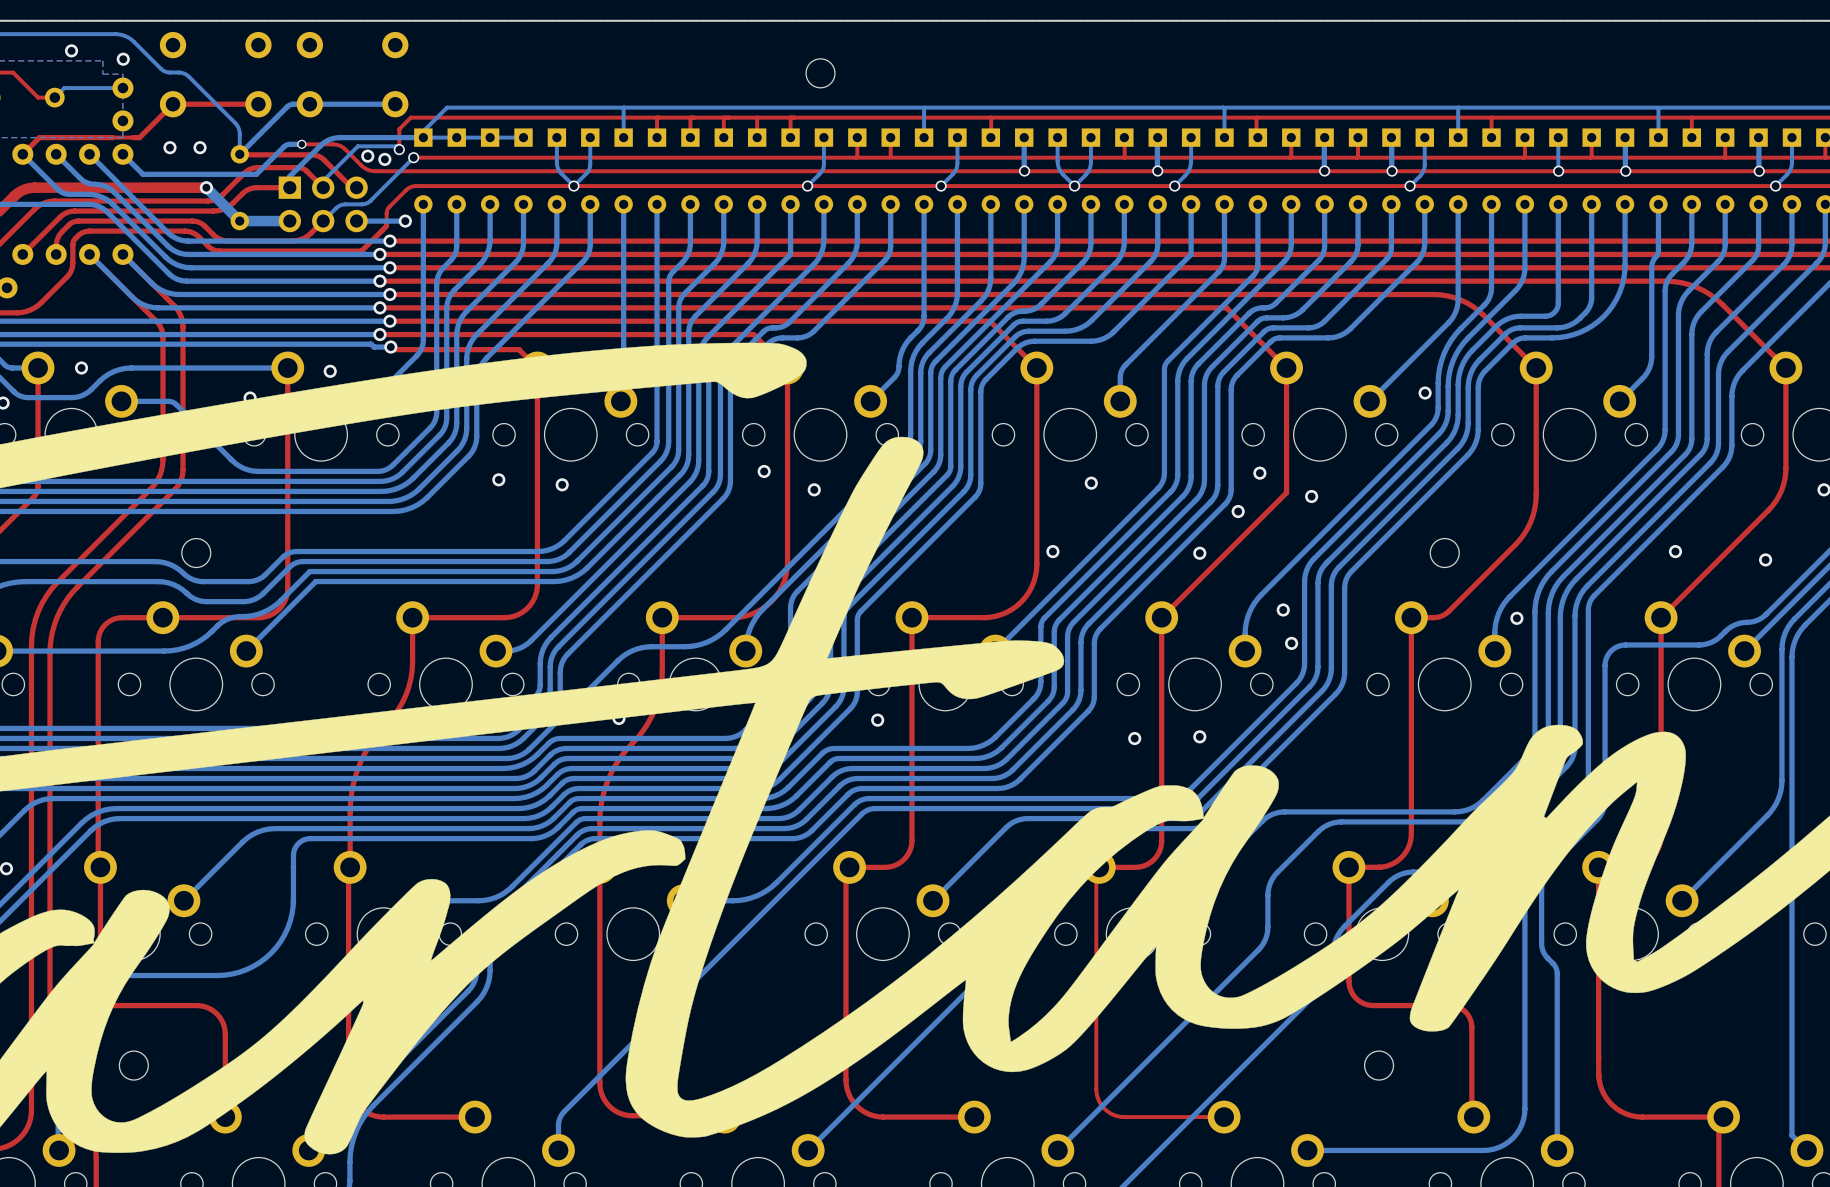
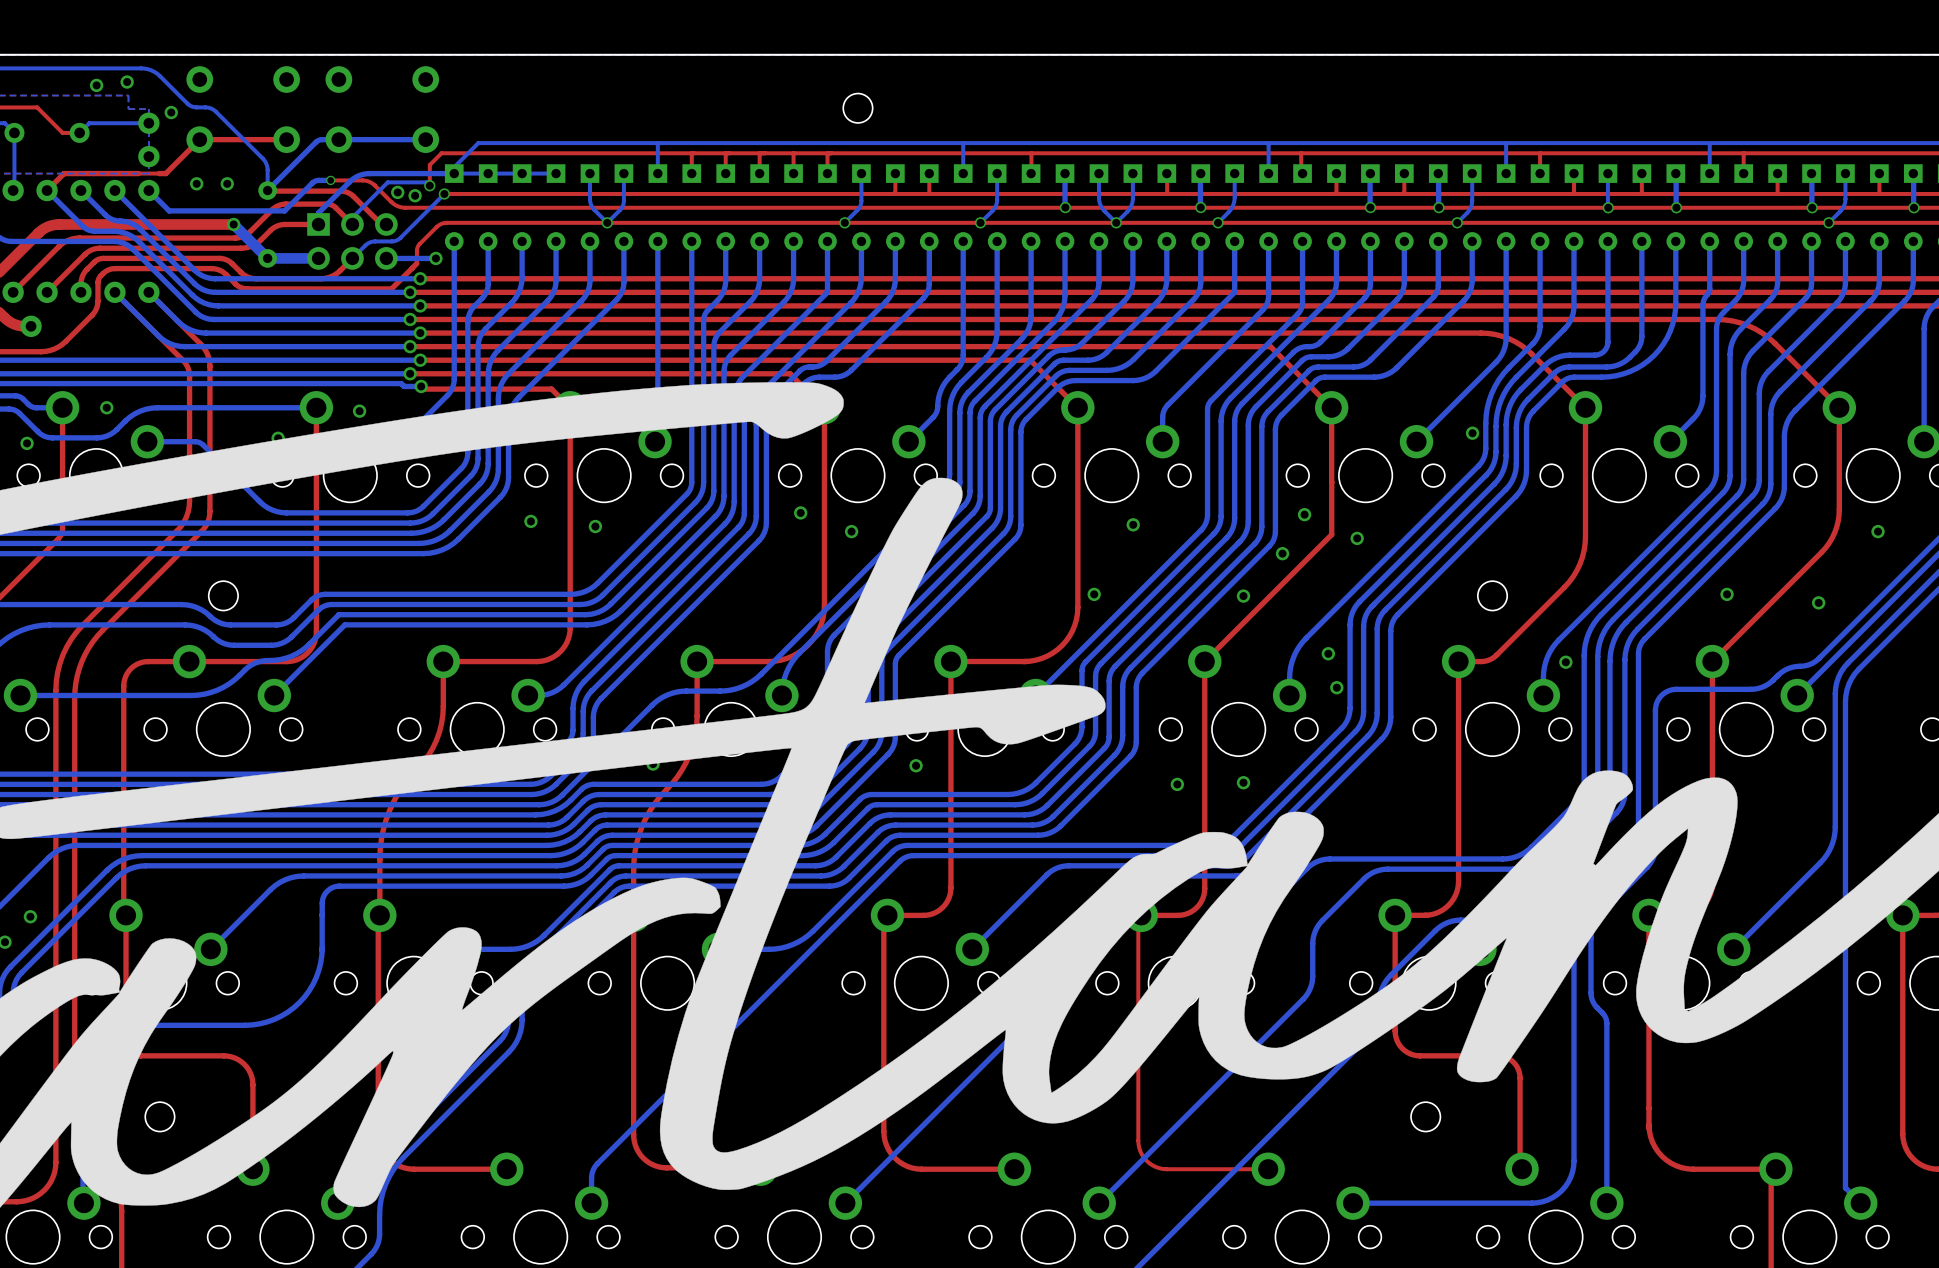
via: none -> (127, 82)
via: (123, 59) -> none
via: none -> (171, 112)

